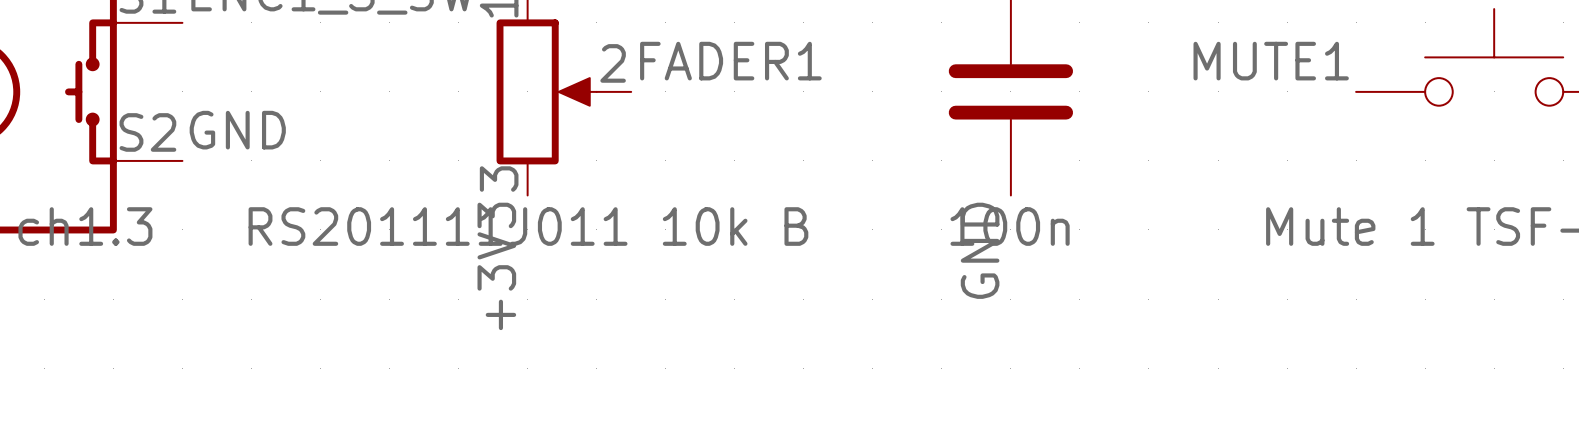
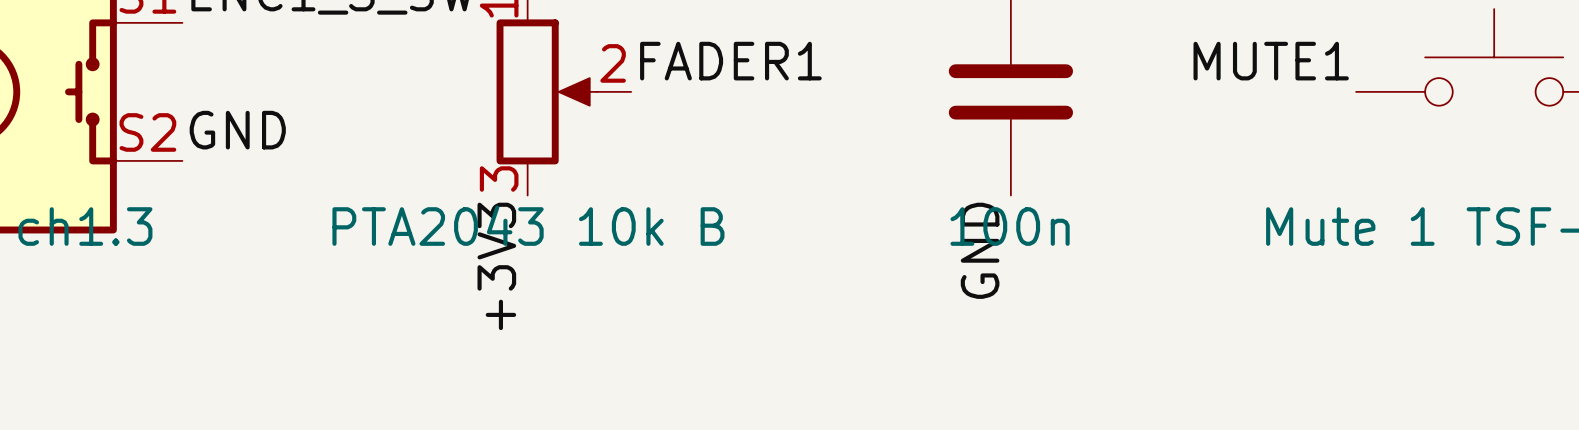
part value: RS201111J011 10k B (528, 226) -> PTA2043 10k B (528, 225)

